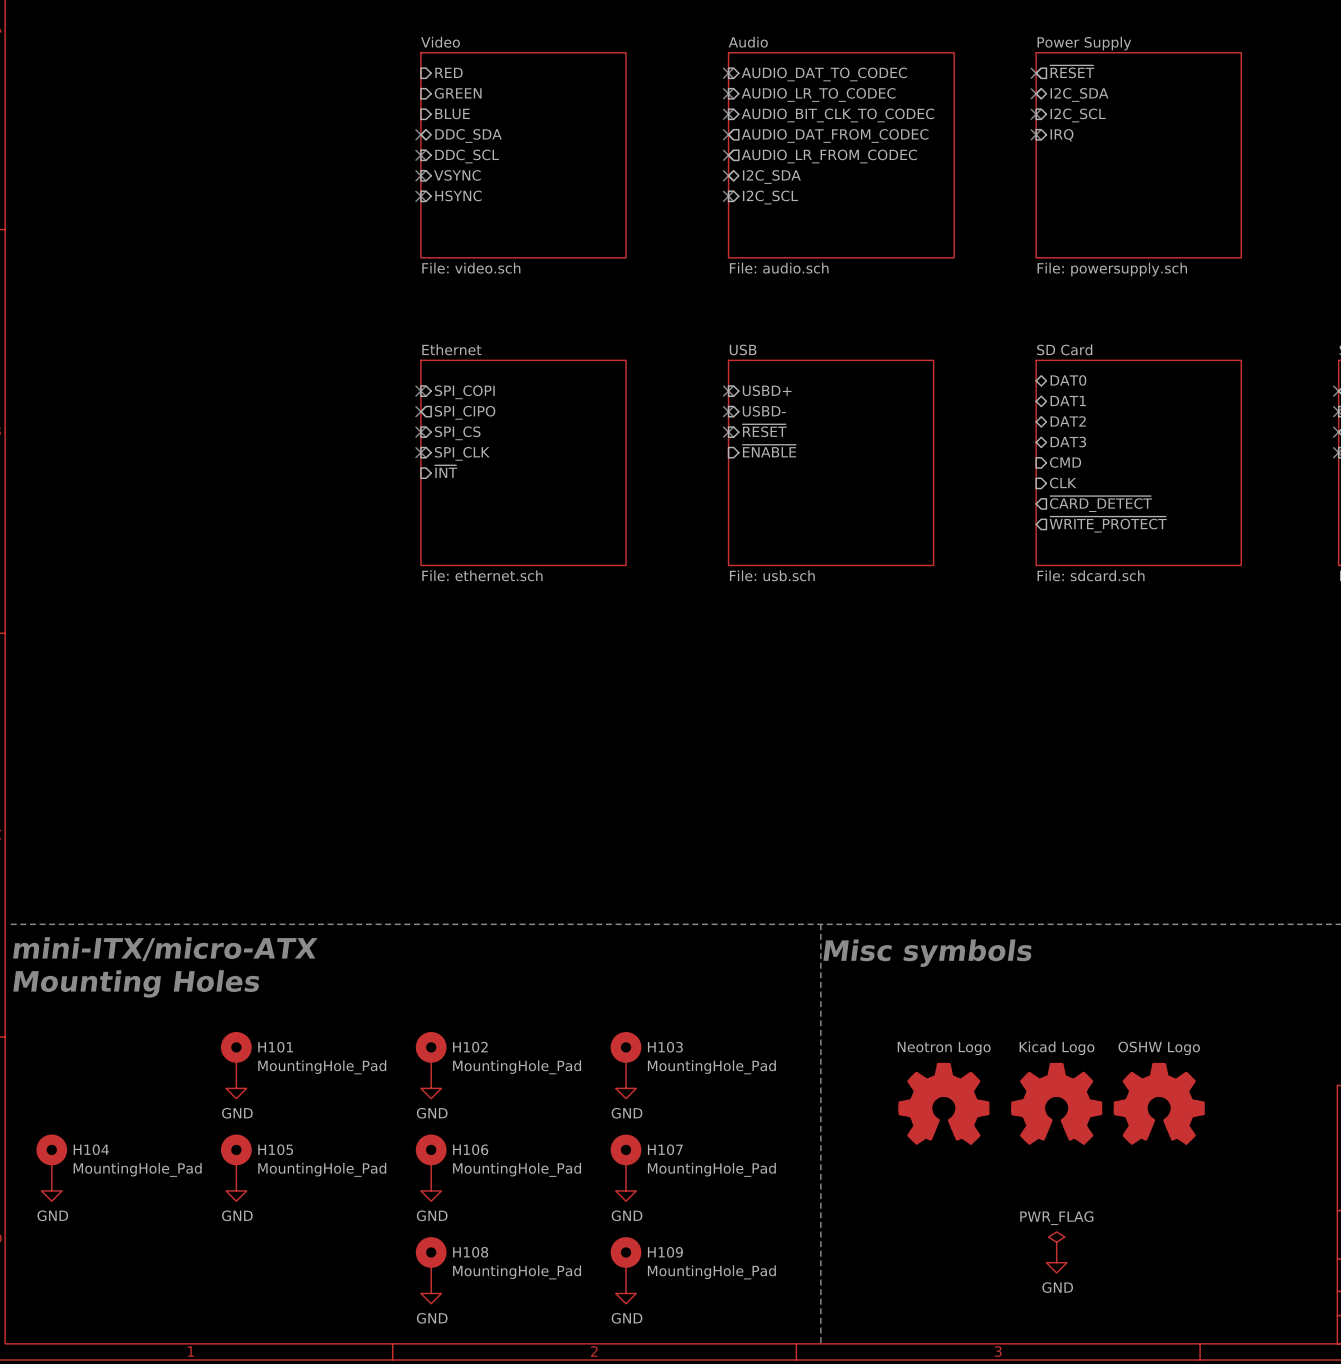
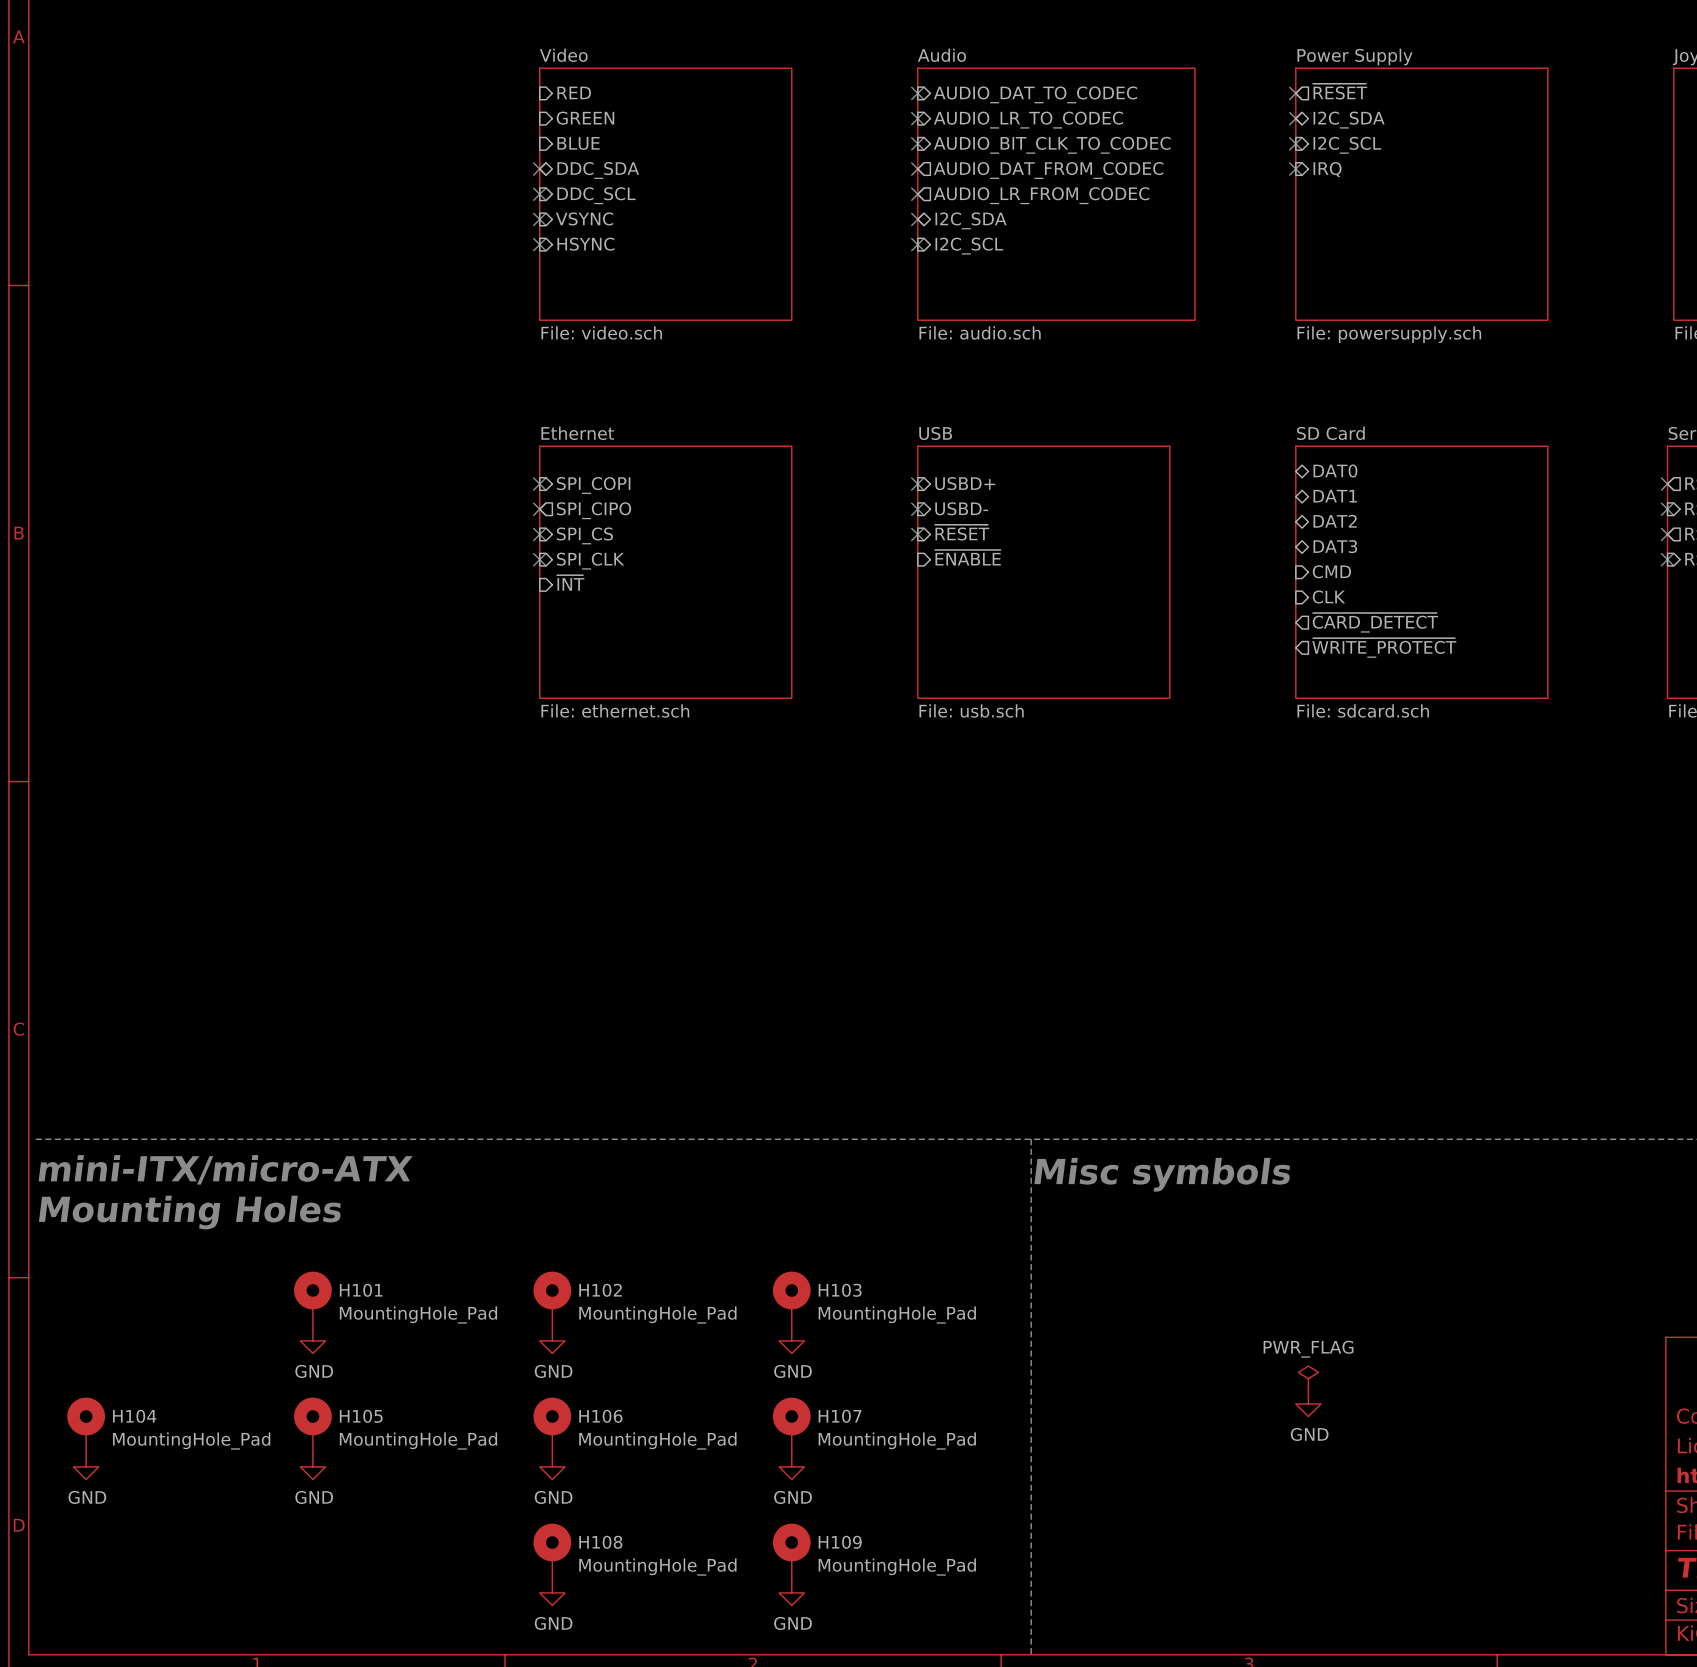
part: Neotron Logo (943, 1103) -> none
part: Kicad Logo (1056, 1103) -> none
part: OSHW Logo (1159, 1103) -> none
power symbol position: PWR_FLAG (1056, 1242) -> PWR_FLAG (1308, 1378)
power symbol position: GND (1056, 1262) -> GND (1308, 1403)

